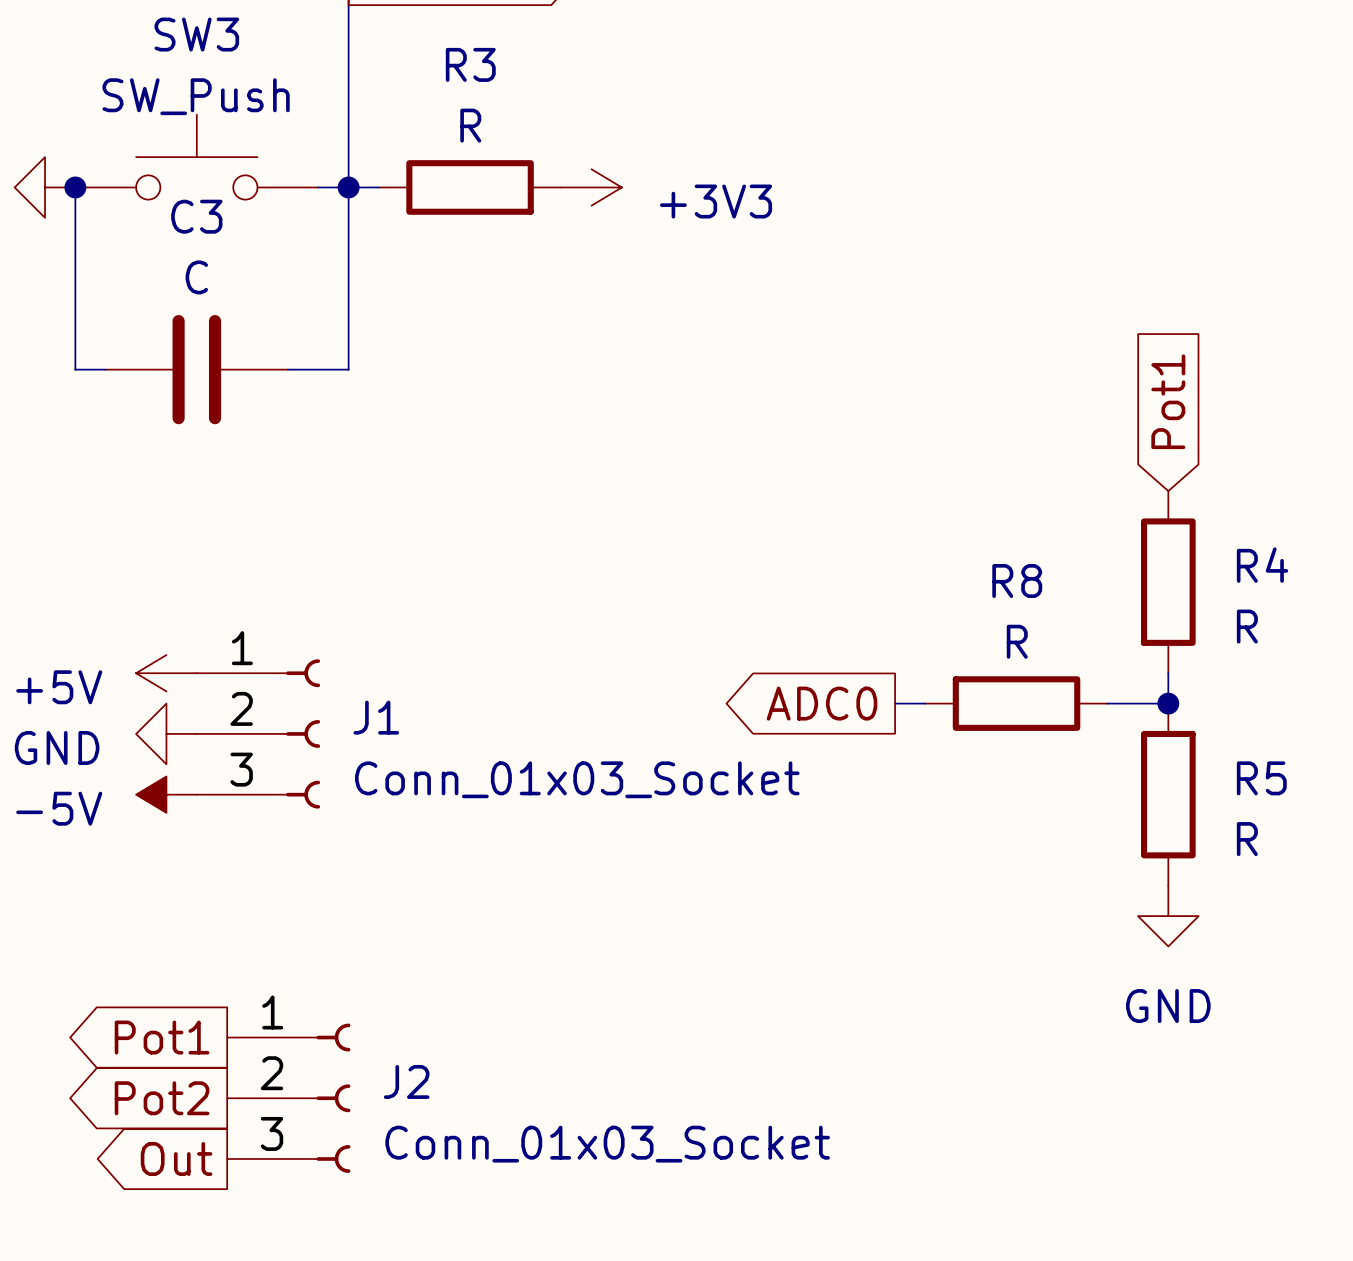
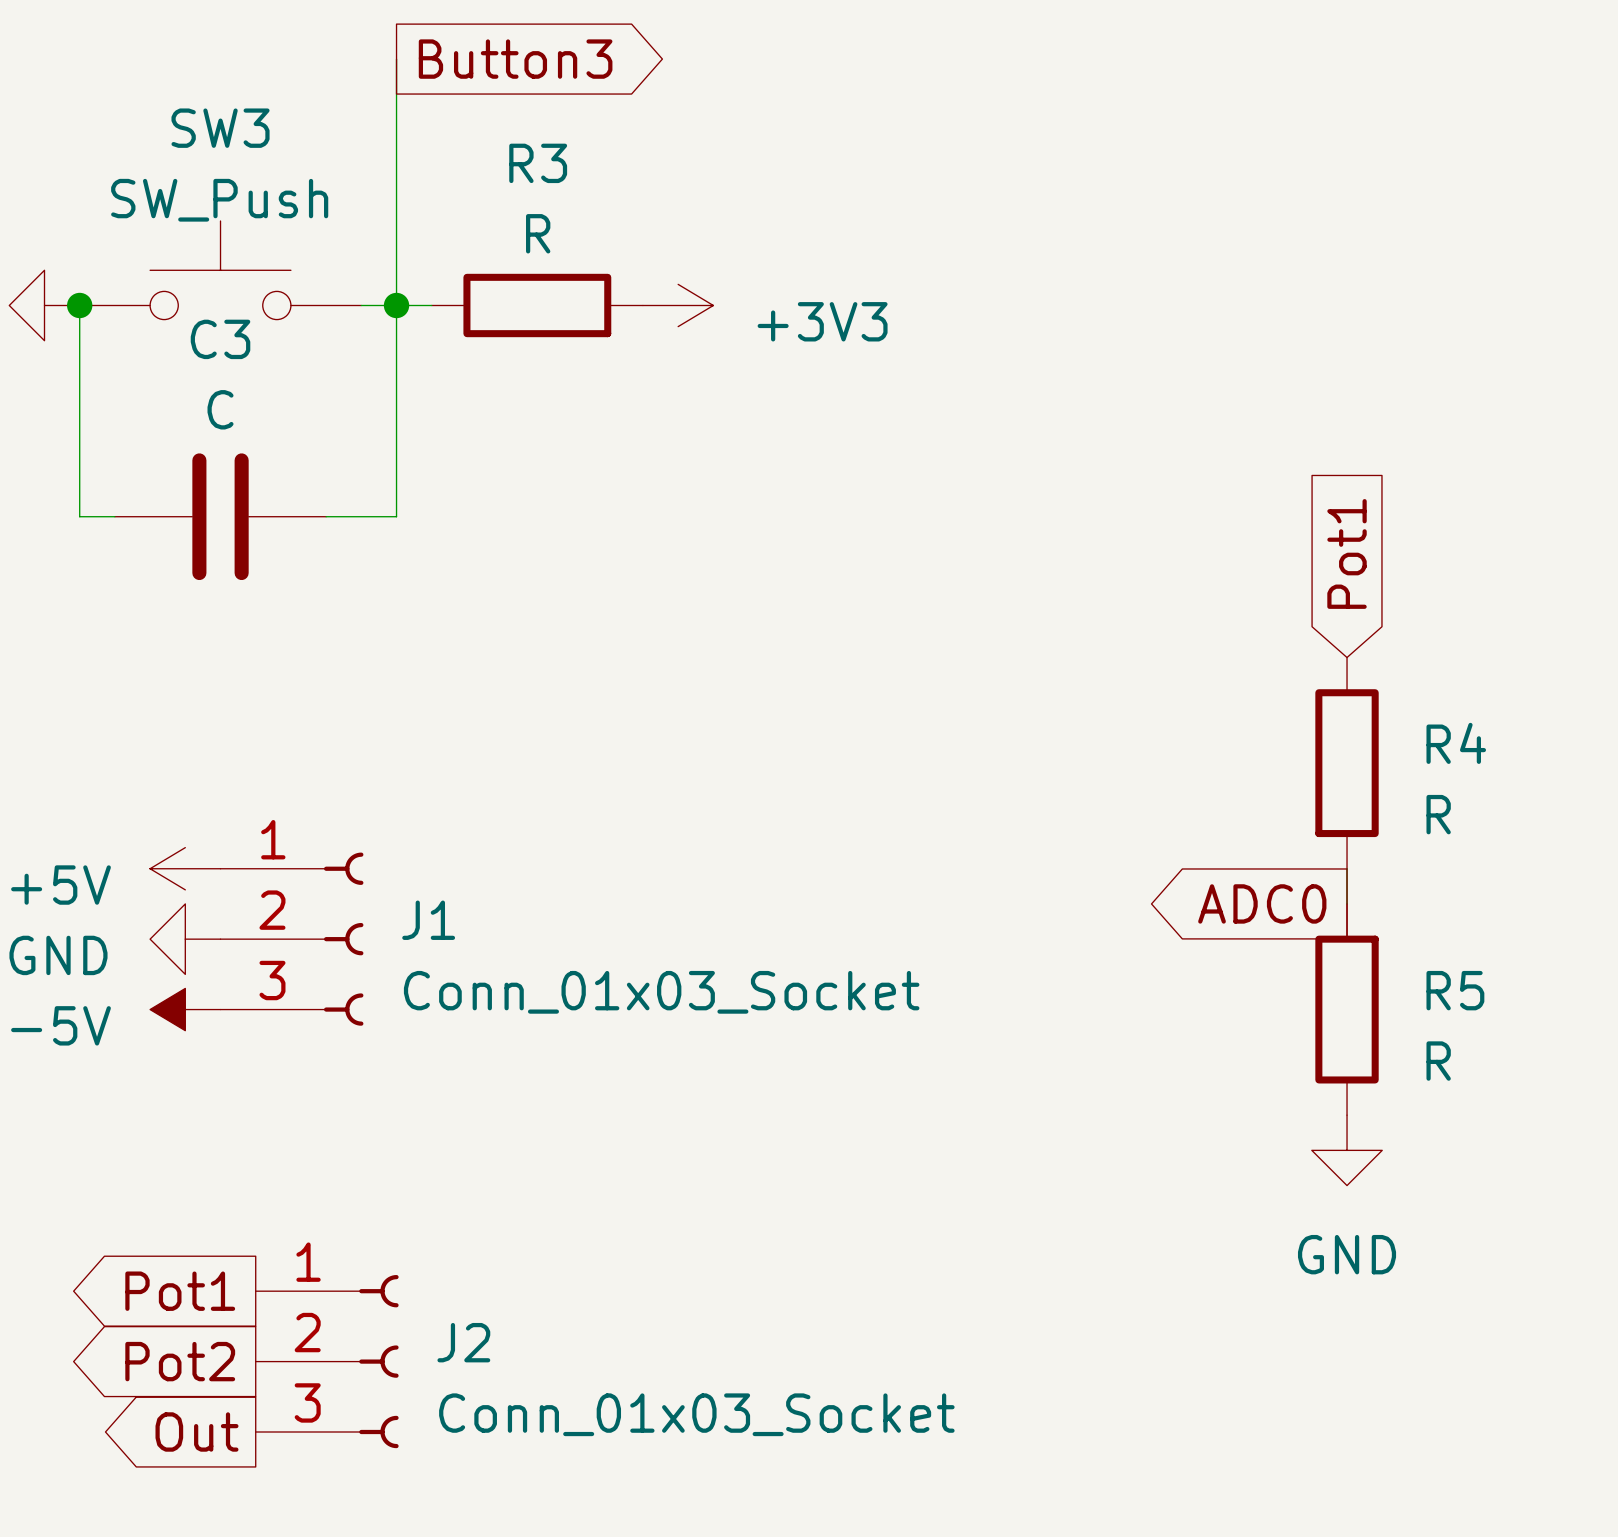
global label position: ADC0 (822, 703) -> ADC0 (1262, 903)
wire: (895, 703) (925, 703) -> none
R8: R (1016, 703) -> none
wire: (1107, 703) (1168, 703) -> none
junction: (1168, 703) -> none

